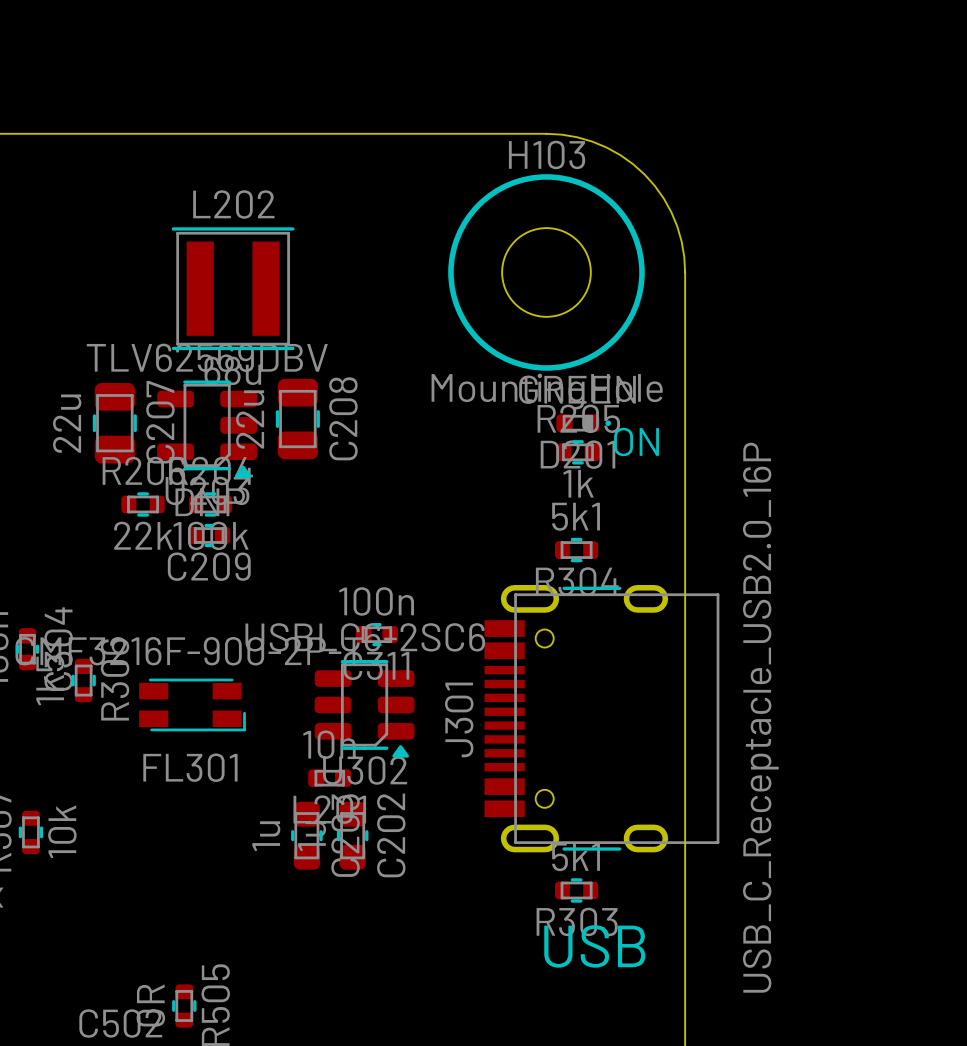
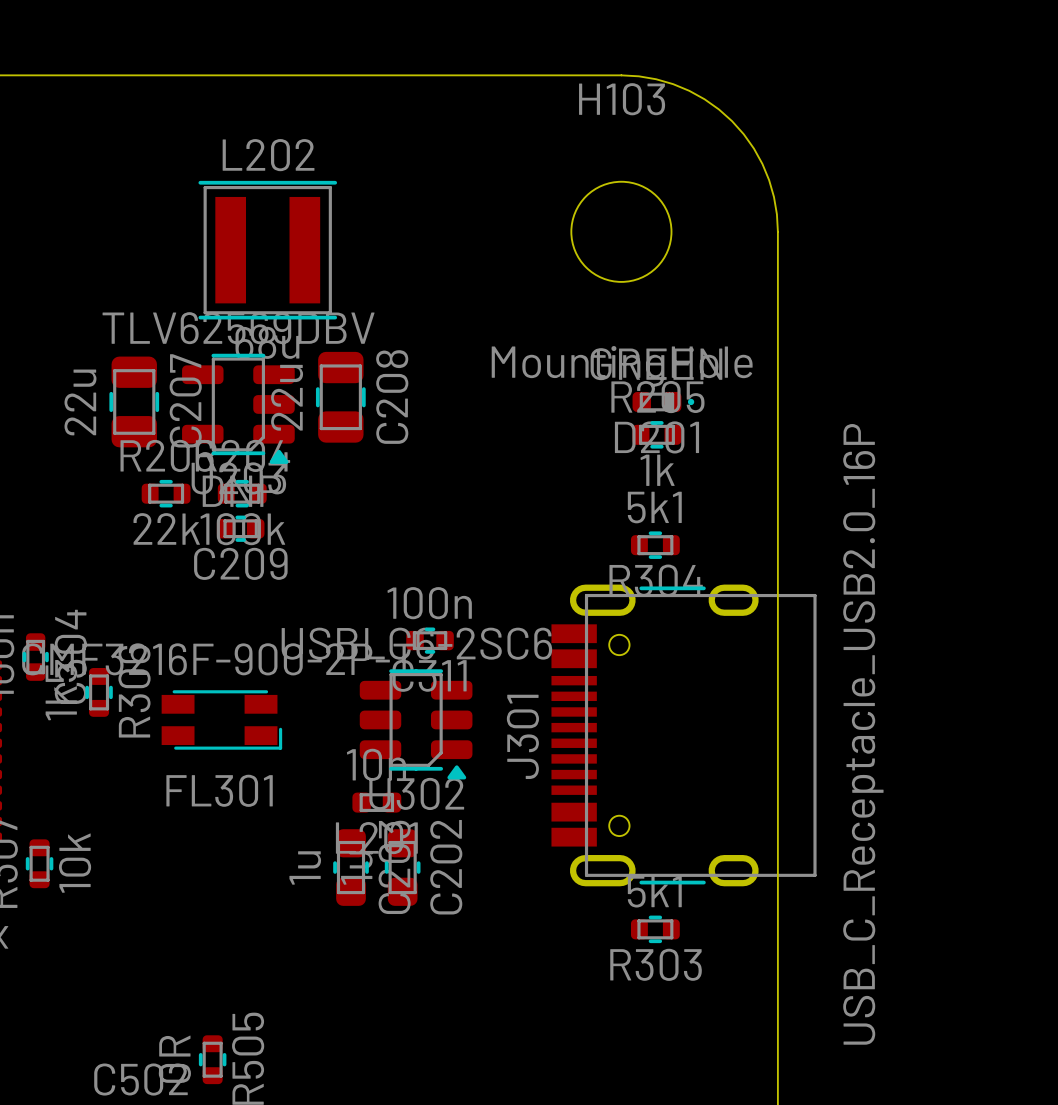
drawing: [448, 174, 645, 371] -> none
text: ON (636, 441) -> none
text: USB (594, 946) -> none

